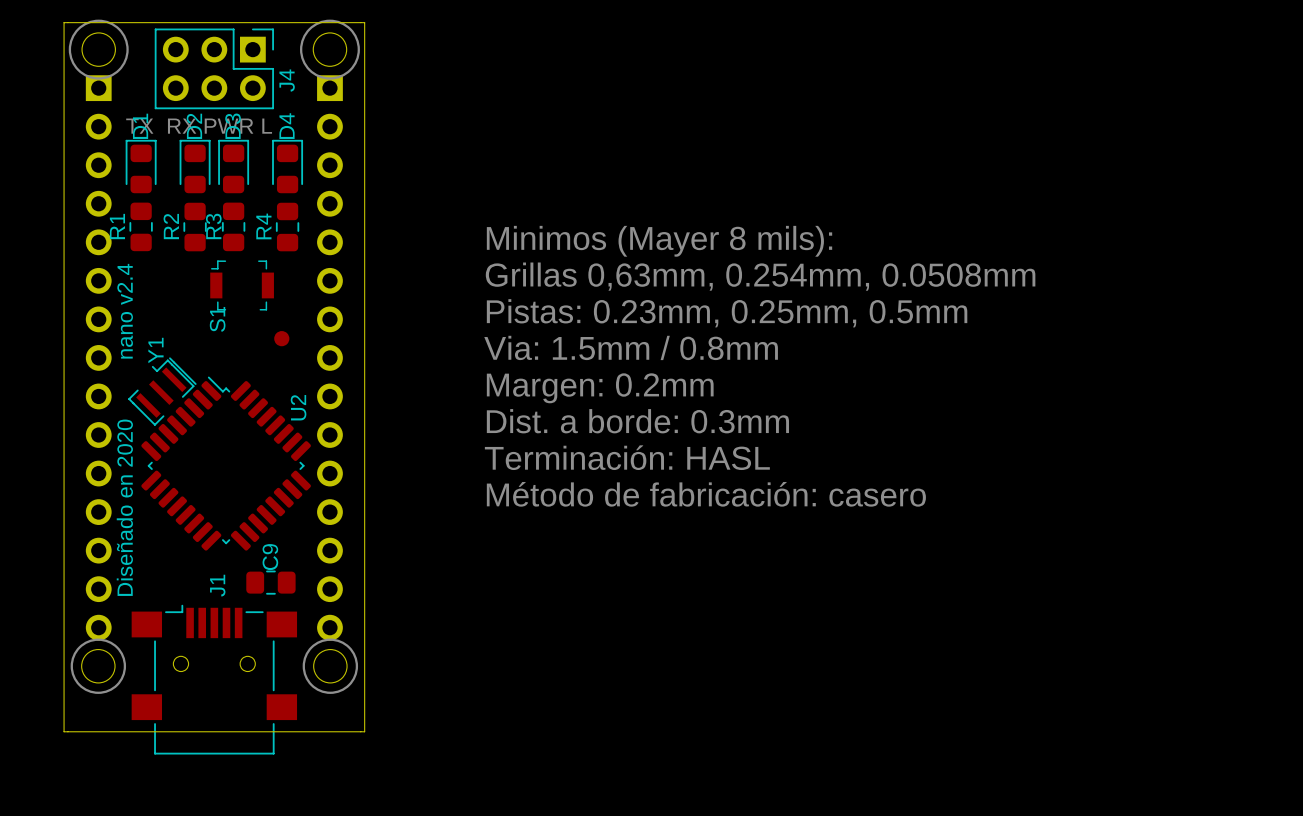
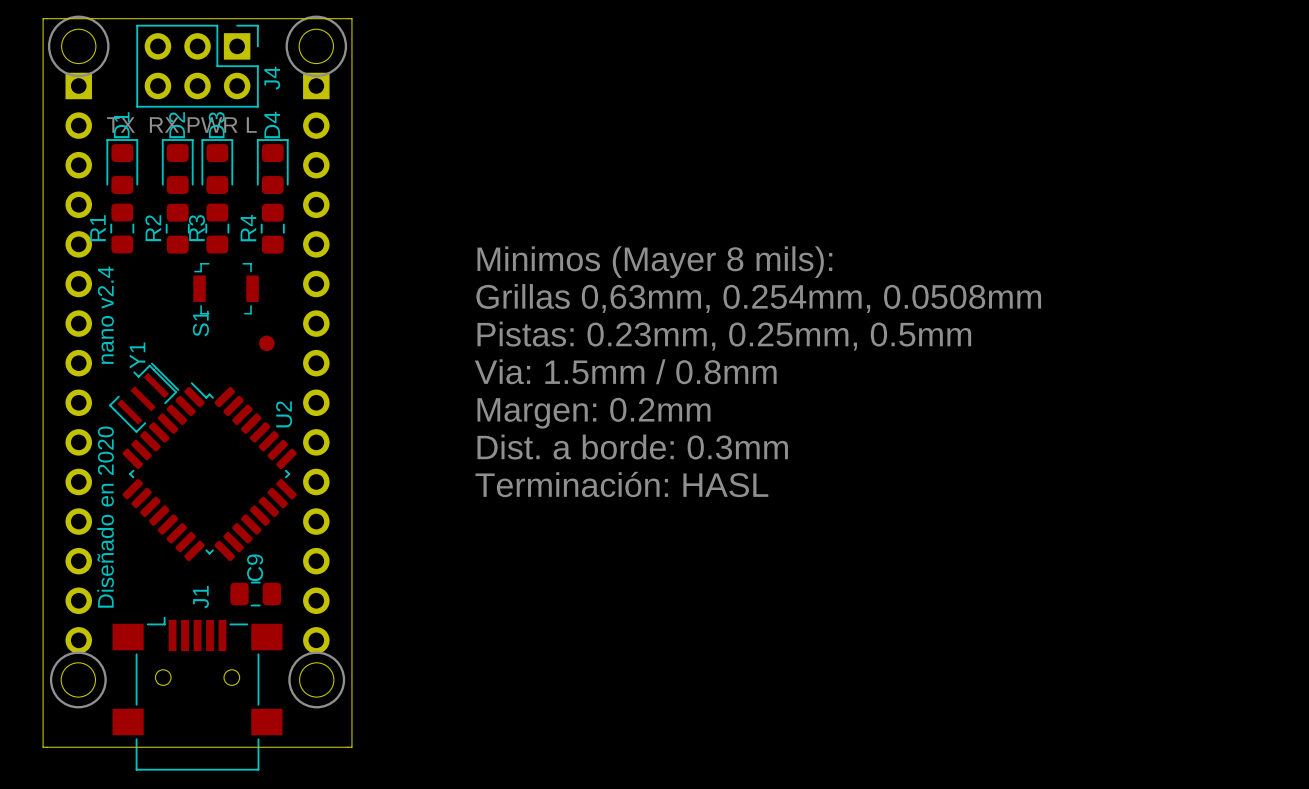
text position: Minimos (Mayer 8 mils): (659, 241) -> Minimos (Mayer 8 mils): (654, 262)
text position: Grillas 0,63mm, 0.254mm, 0.0508mm (760, 276) -> Grillas 0,63mm, 0.254mm, 0.0508mm (758, 298)
text position: Pistas: 0.23mm, 0.25mm, 0.5mm (727, 313) -> Pistas: 0.23mm, 0.25mm, 0.5mm (724, 336)
text position: Via: 1.5mm / 0.8mm (631, 347) -> Via: 1.5mm / 0.8mm (625, 371)
text position: Margen: 0.2mm (600, 388) -> Margen: 0.2mm (593, 413)
text position: Dist. a borde: 0.3mm (637, 421) -> Dist. a borde: 0.3mm (632, 447)
text position: Terminación: HASL (627, 457) -> Terminación: HASL (621, 484)
text: Método de fabricación: casero (706, 494) -> none

